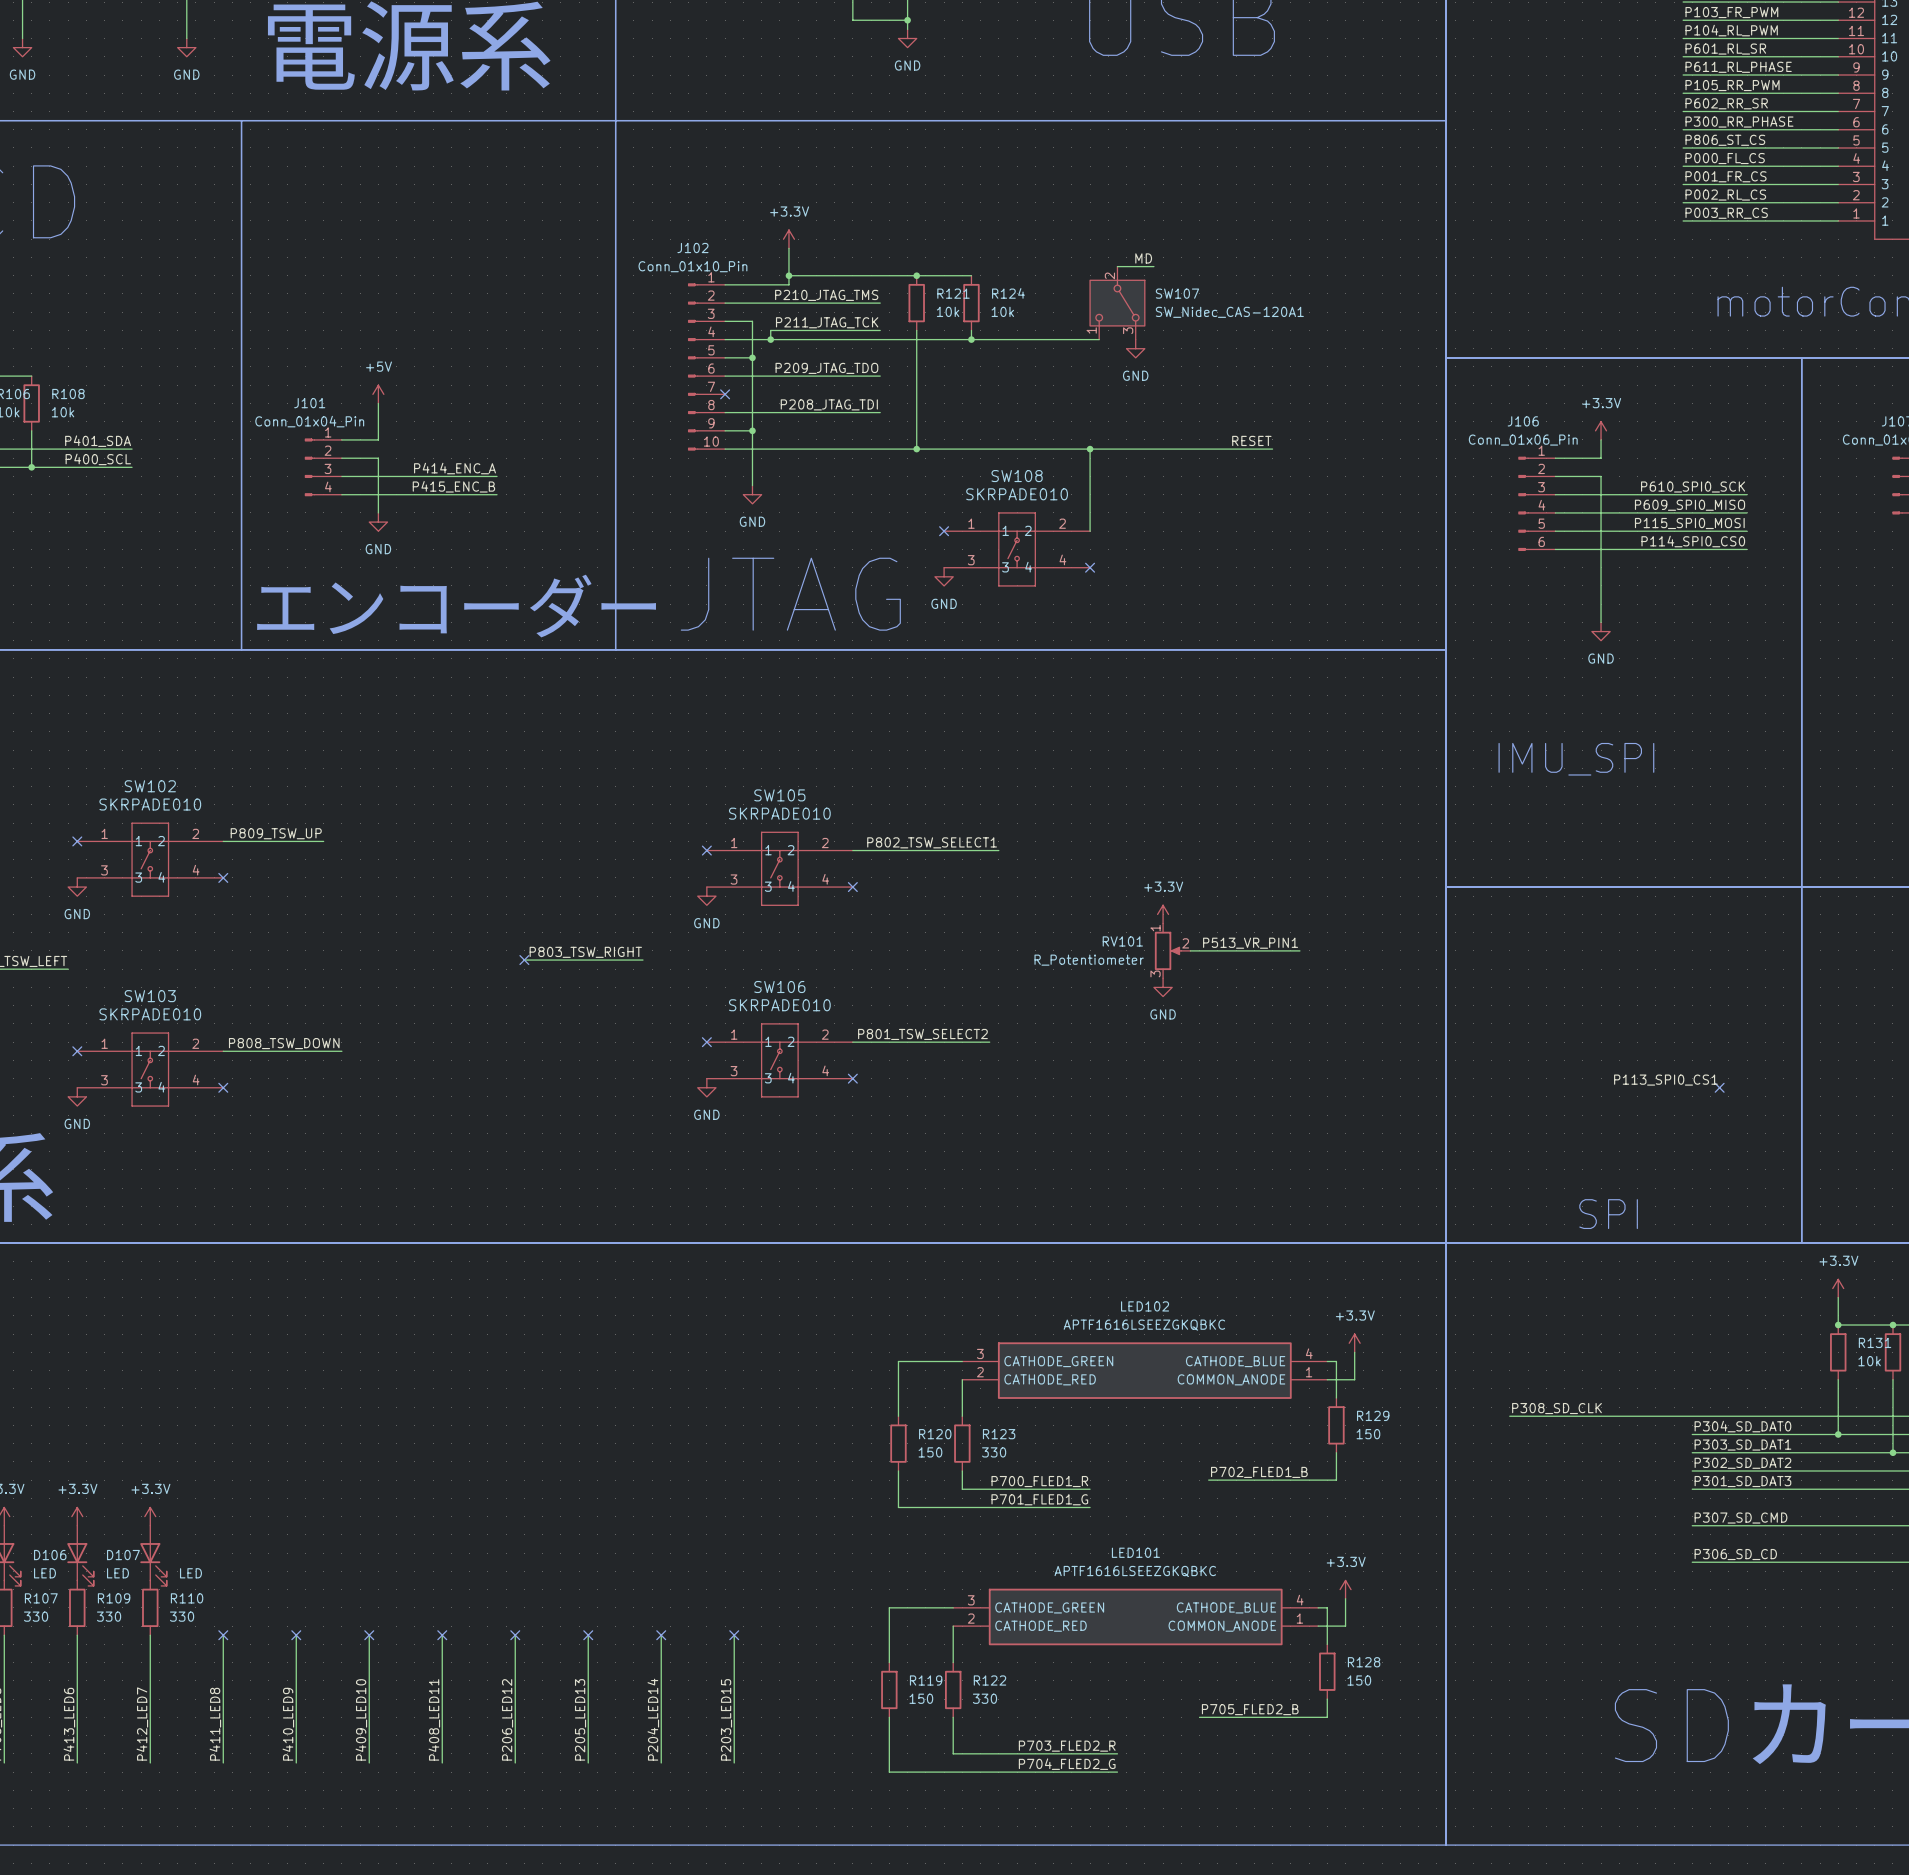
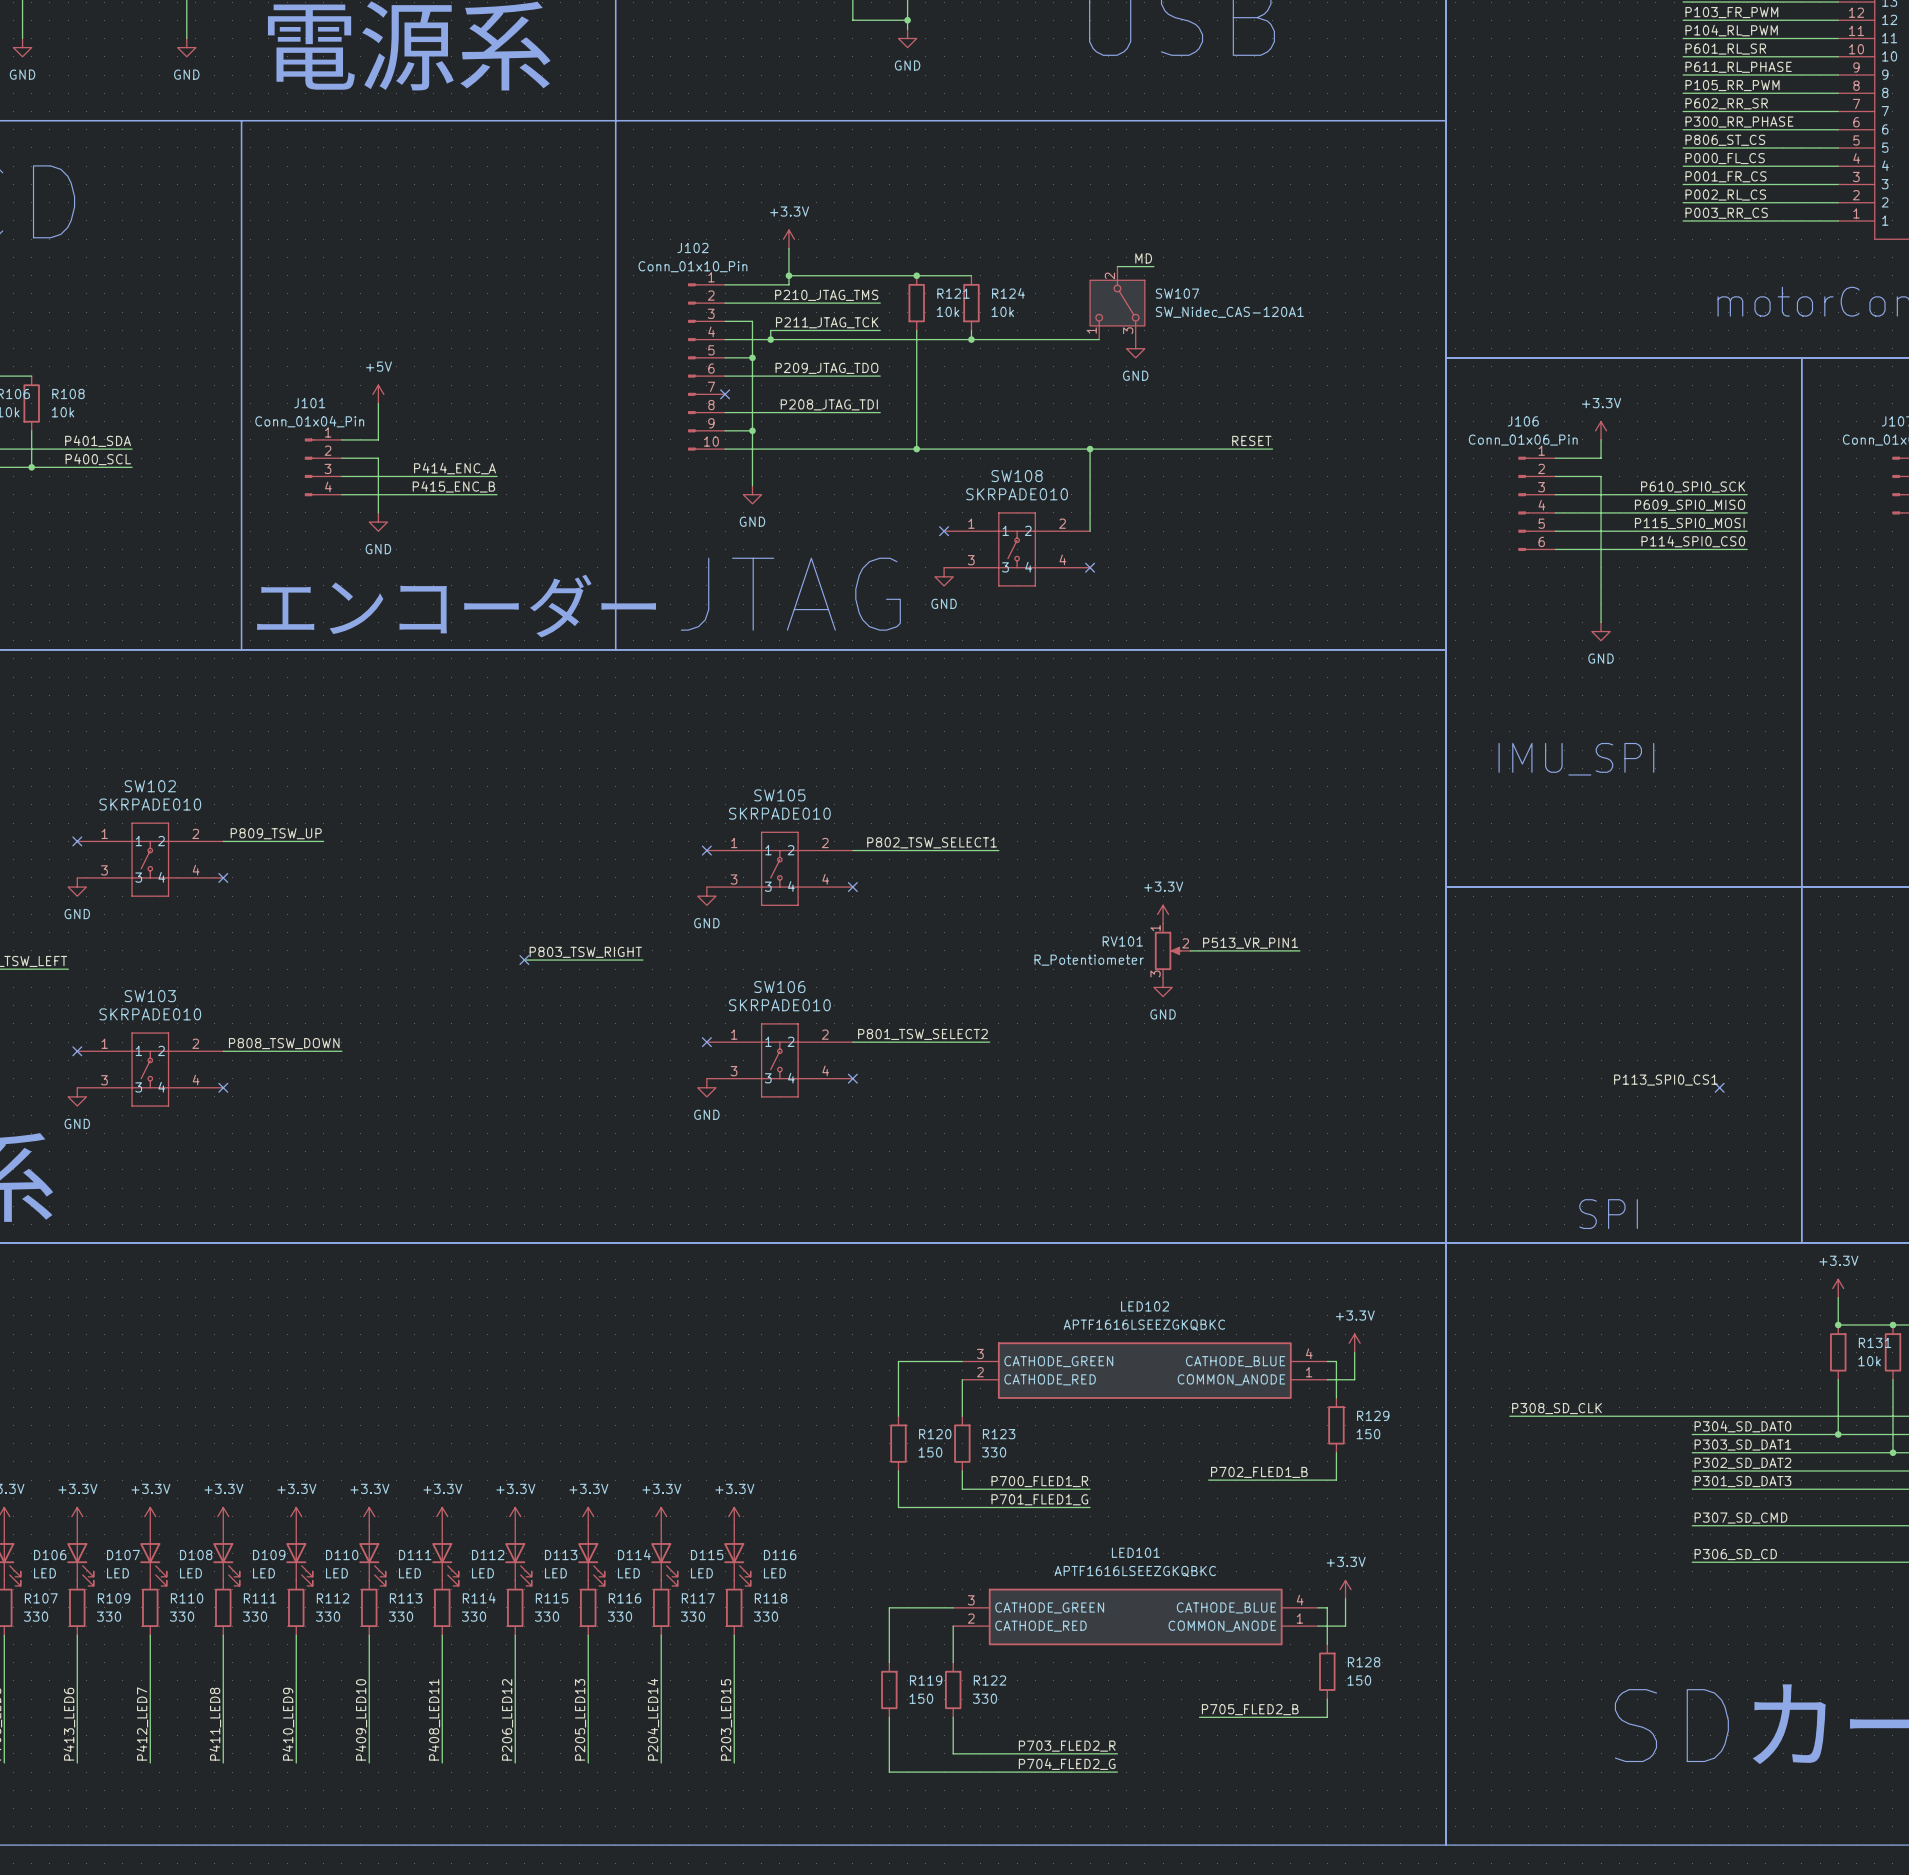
power symbol: none -> +3.3V (223, 1516)
power symbol: none -> +3.3V (296, 1516)
power symbol: none -> +3.3V (369, 1516)
power symbol: none -> +3.3V (442, 1516)
power symbol: none -> +3.3V (515, 1516)
power symbol: none -> +3.3V (588, 1516)
power symbol: none -> +3.3V (661, 1516)
power symbol: none -> +3.3V (734, 1516)
D108 name: none -> D108 (196, 1555)
D109: none -> LED (226, 1555)
D110: none -> LED (299, 1555)
D111: none -> LED (372, 1555)
D112: none -> LED (445, 1555)
D113: none -> LED (518, 1555)
D114: none -> LED (591, 1555)
D115: none -> LED (664, 1555)
D116: none -> LED (737, 1555)
R111: none -> 330 (223, 1607)
R112: none -> 330 (296, 1607)
R113: none -> 330 (369, 1607)
R114: none -> 330 (442, 1607)
R115: none -> 330 (515, 1607)
R116: none -> 330 (588, 1607)
R117: none -> 330 (661, 1607)
R118: none -> 330 (734, 1607)
no-connect mark: (223, 1635) -> none
no-connect mark: (296, 1635) -> none
no-connect mark: (369, 1635) -> none
no-connect mark: (442, 1635) -> none
no-connect mark: (515, 1635) -> none
no-connect mark: (588, 1635) -> none
no-connect mark: (661, 1635) -> none
no-connect mark: (734, 1635) -> none

